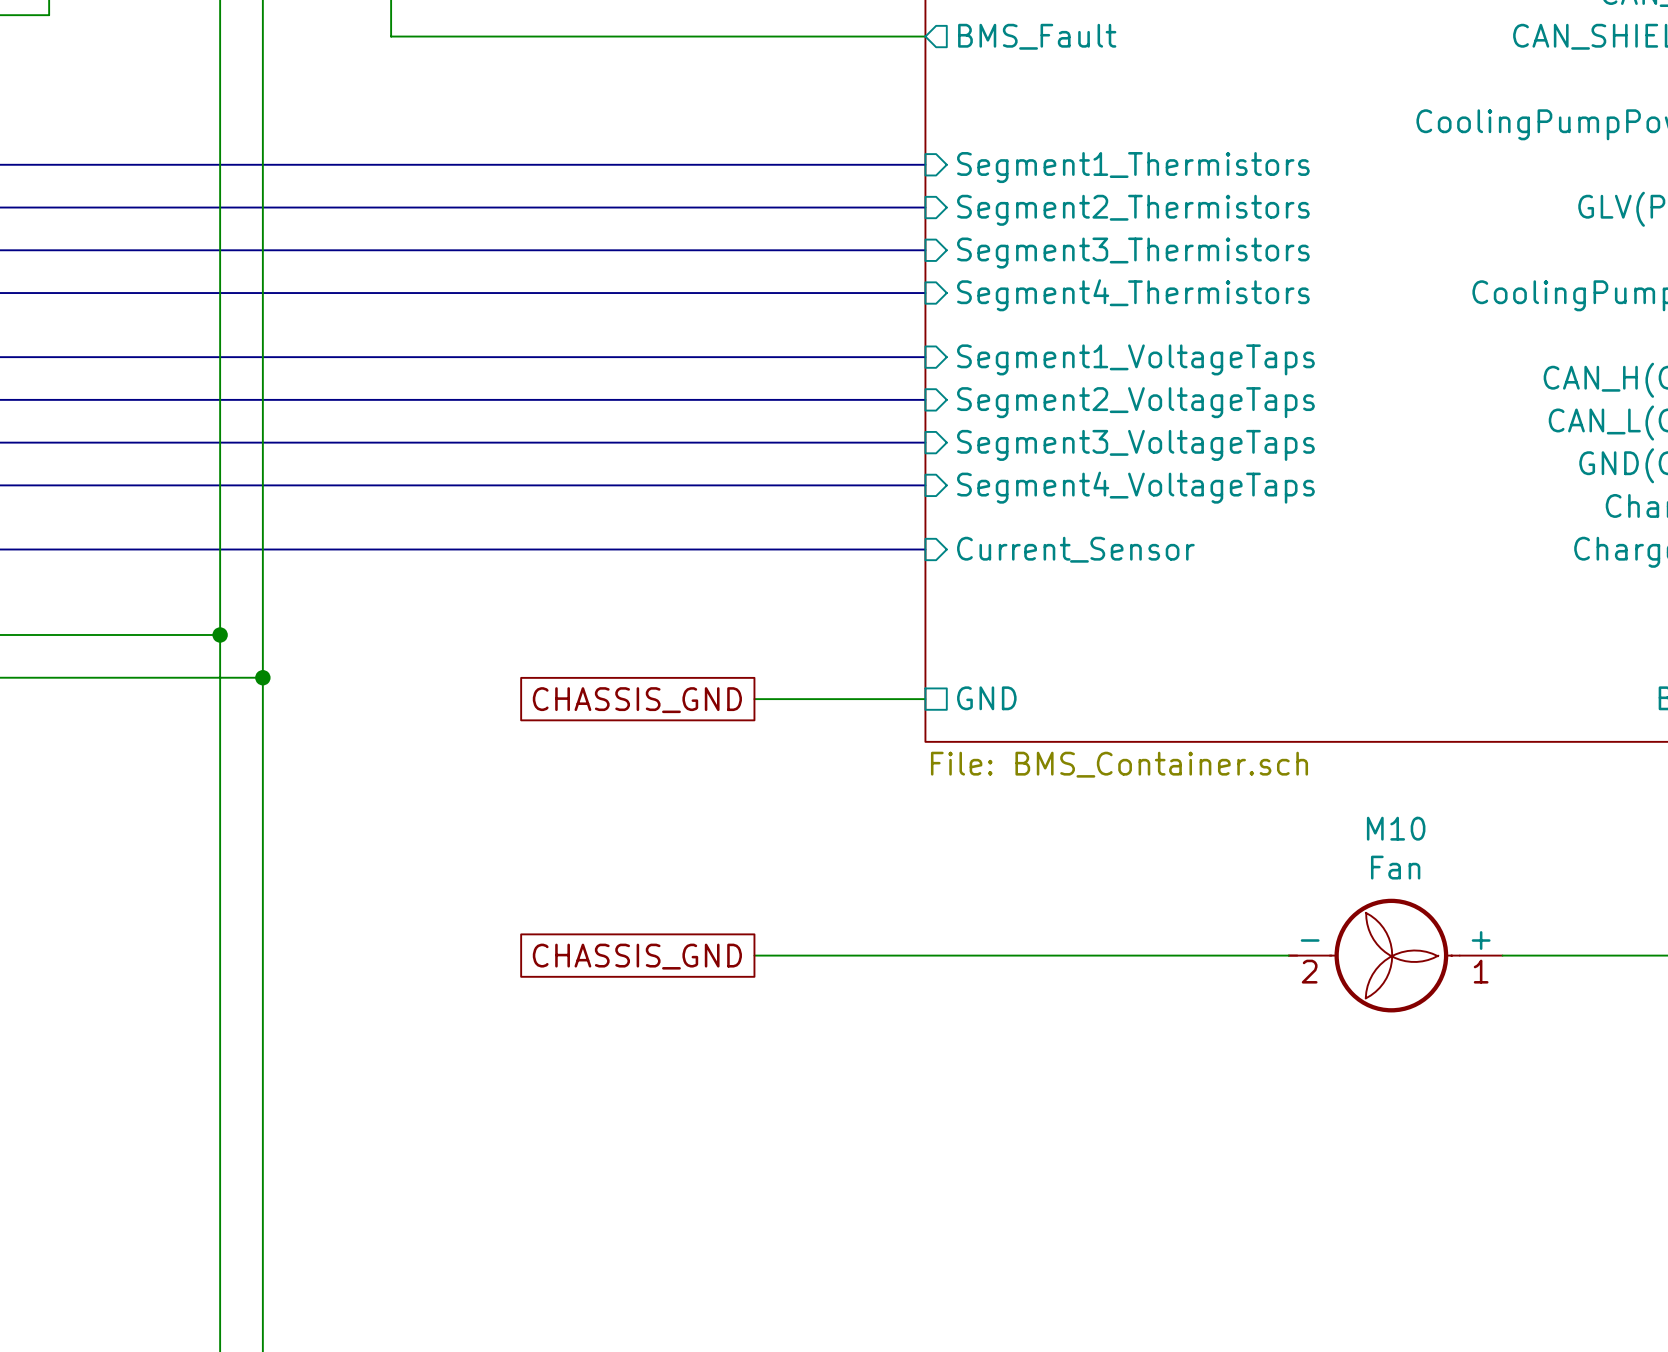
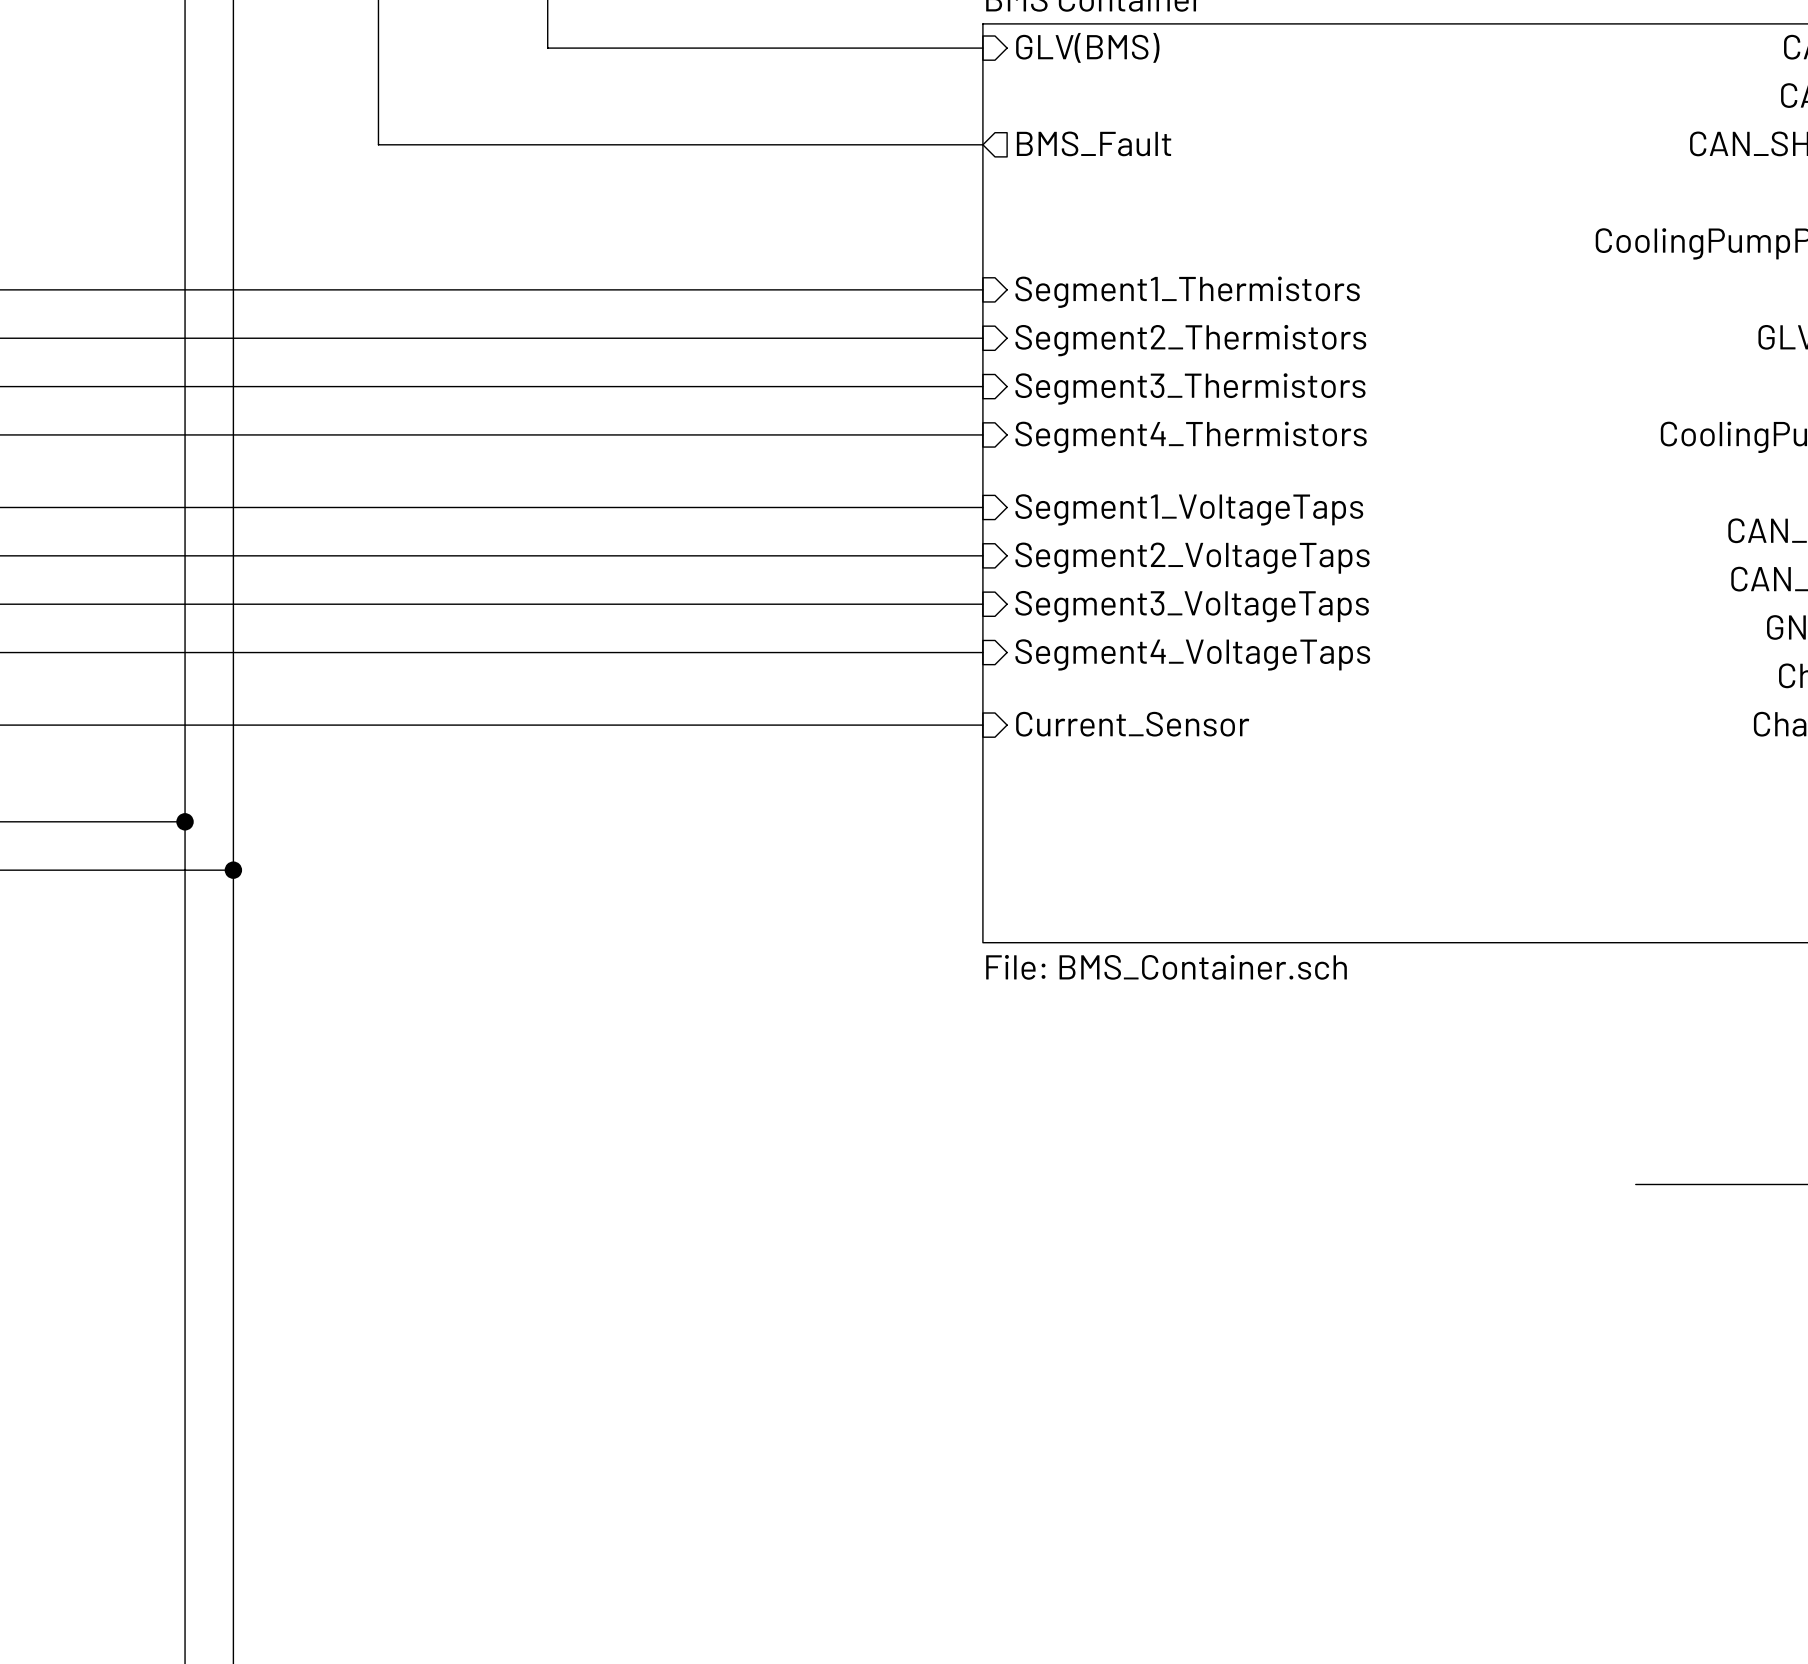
sheet pin: GND (986, 698) -> none
wire: (754, 699) (925, 699) -> none
global label: CHASSIS_GND (637, 700) -> none
wire: (754, 955) (1288, 955) -> none
M10: Fan (1395, 955) -> none
global label: CHASSIS_GND (637, 956) -> none

